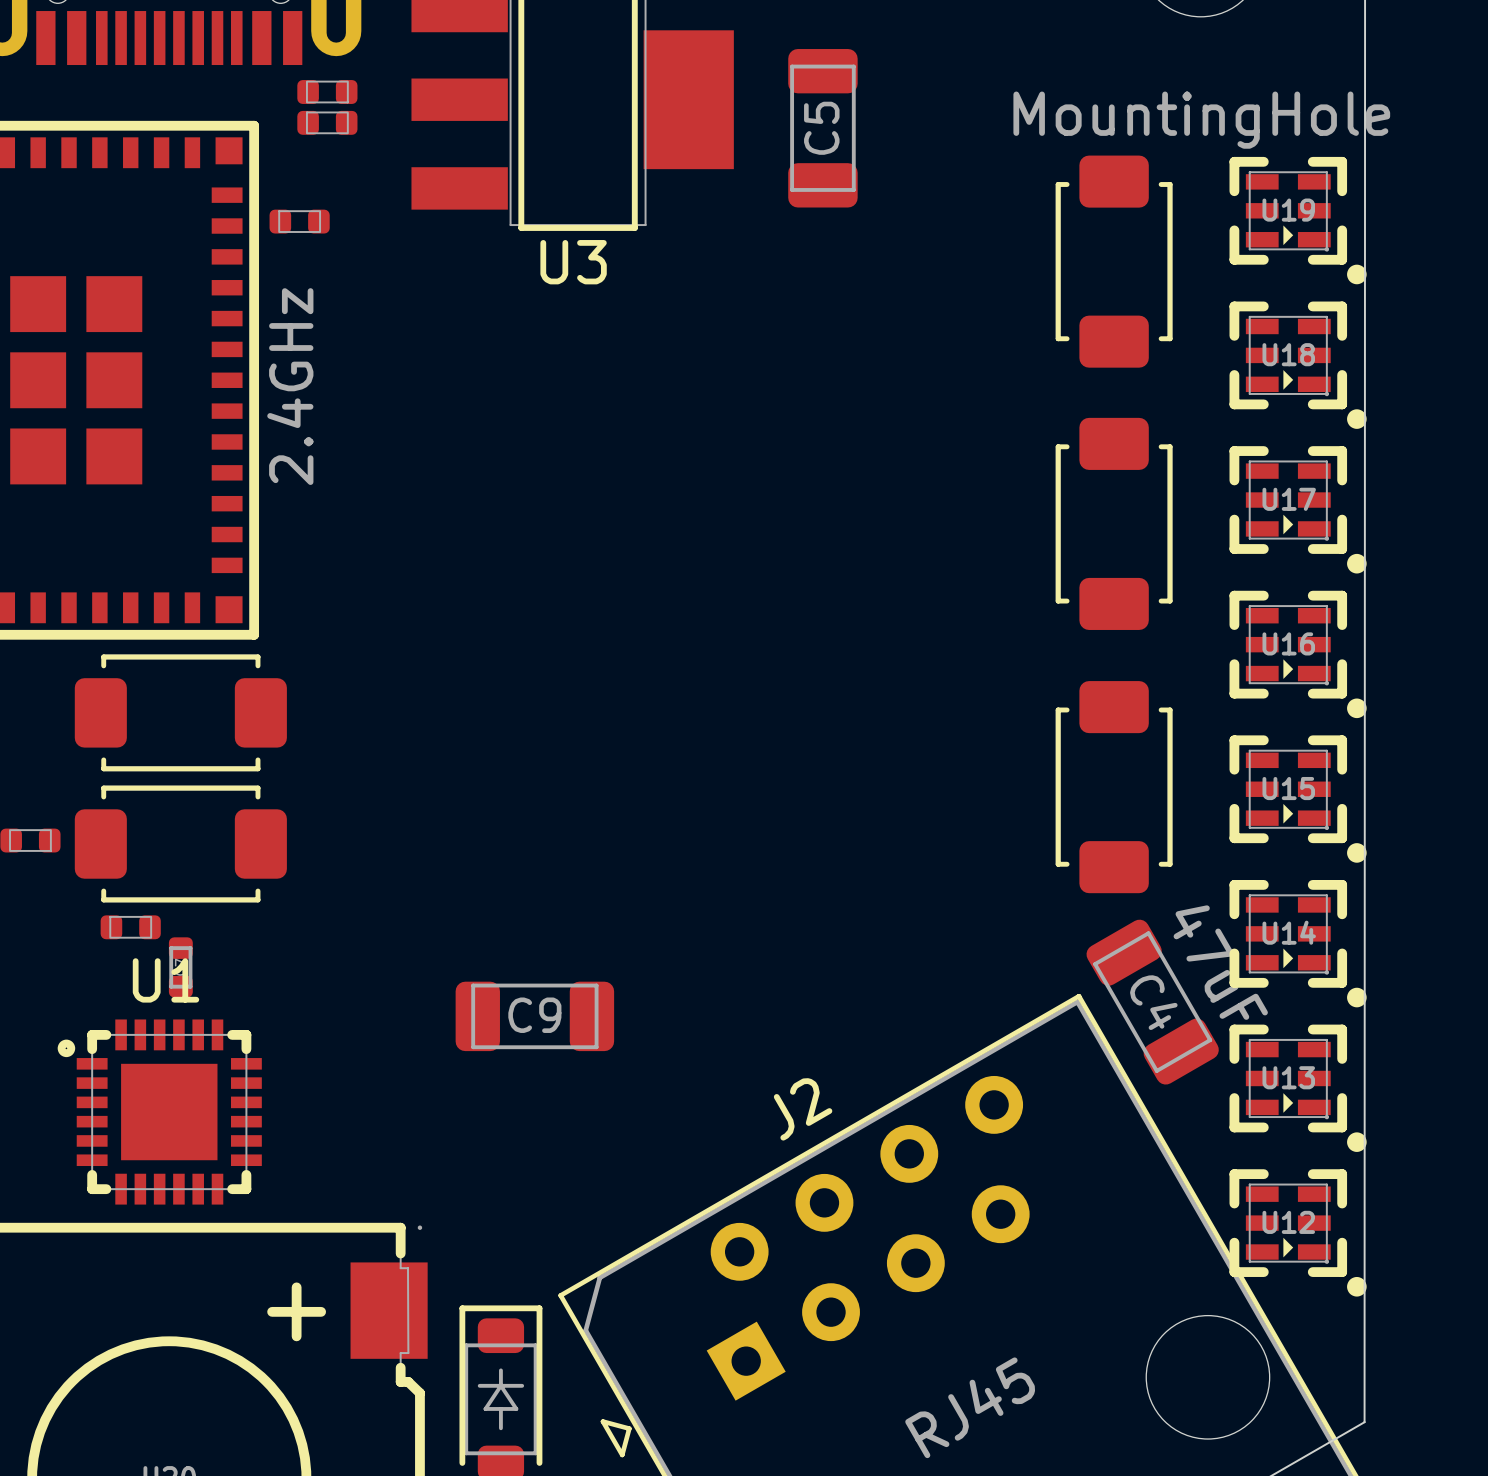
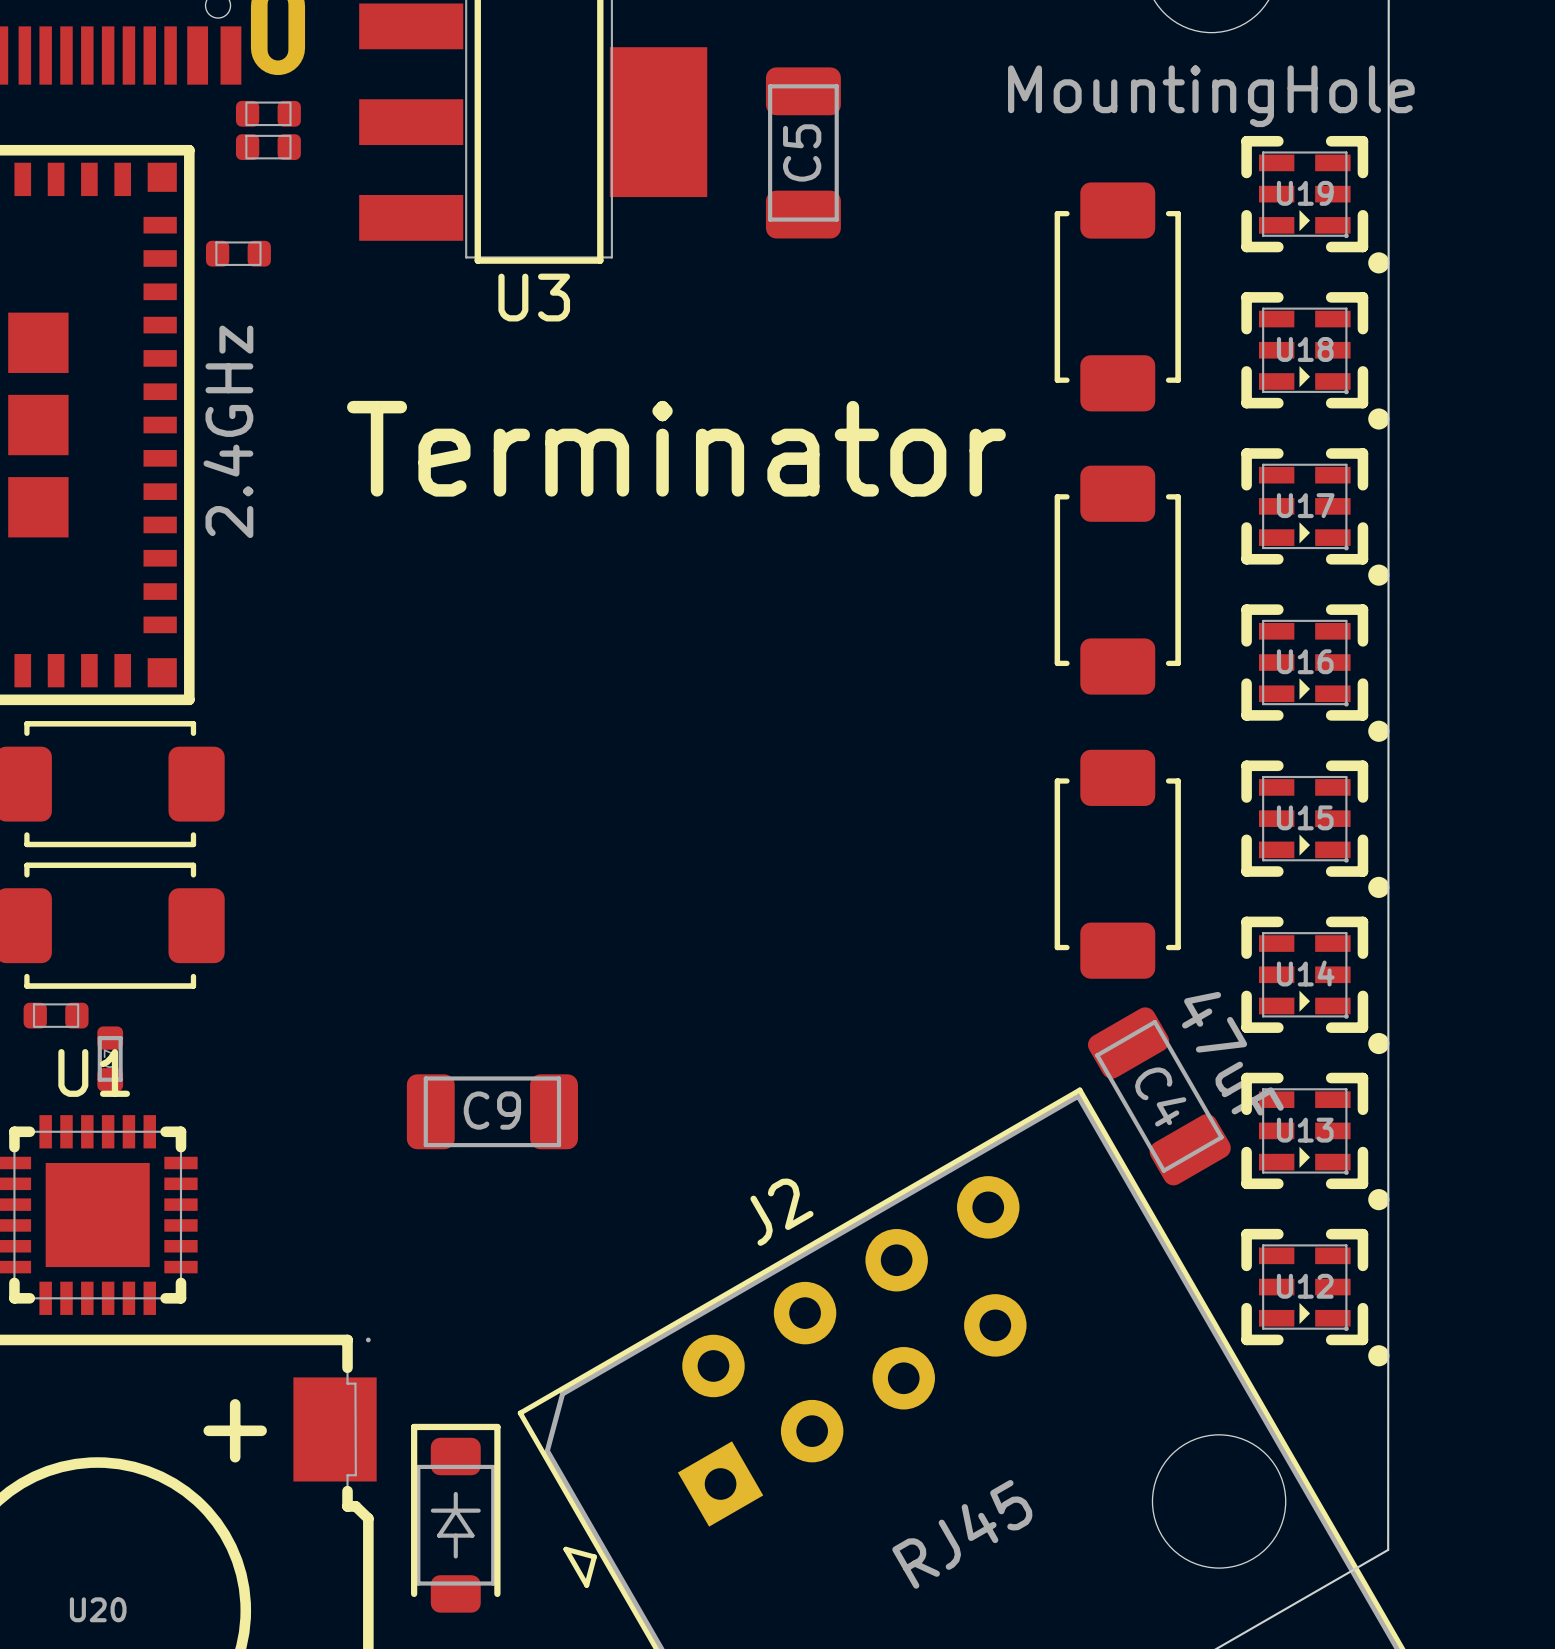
part value position: MountingHole (1201, 120) -> MountingHole (1211, 96)
U19 position: (1298, 220) -> (1315, 204)
U18 position: (1298, 365) -> (1315, 360)
text: none -> Terminator (676, 448)
U17 position: (1298, 509) -> (1315, 516)
U16 position: (1298, 654) -> (1315, 673)
U15 position: (1298, 799) -> (1315, 829)
U14 position: (1298, 943) -> (1315, 985)
U13 position: (1298, 1088) -> (1315, 1141)
U12 position: (1298, 1232) -> (1315, 1297)

